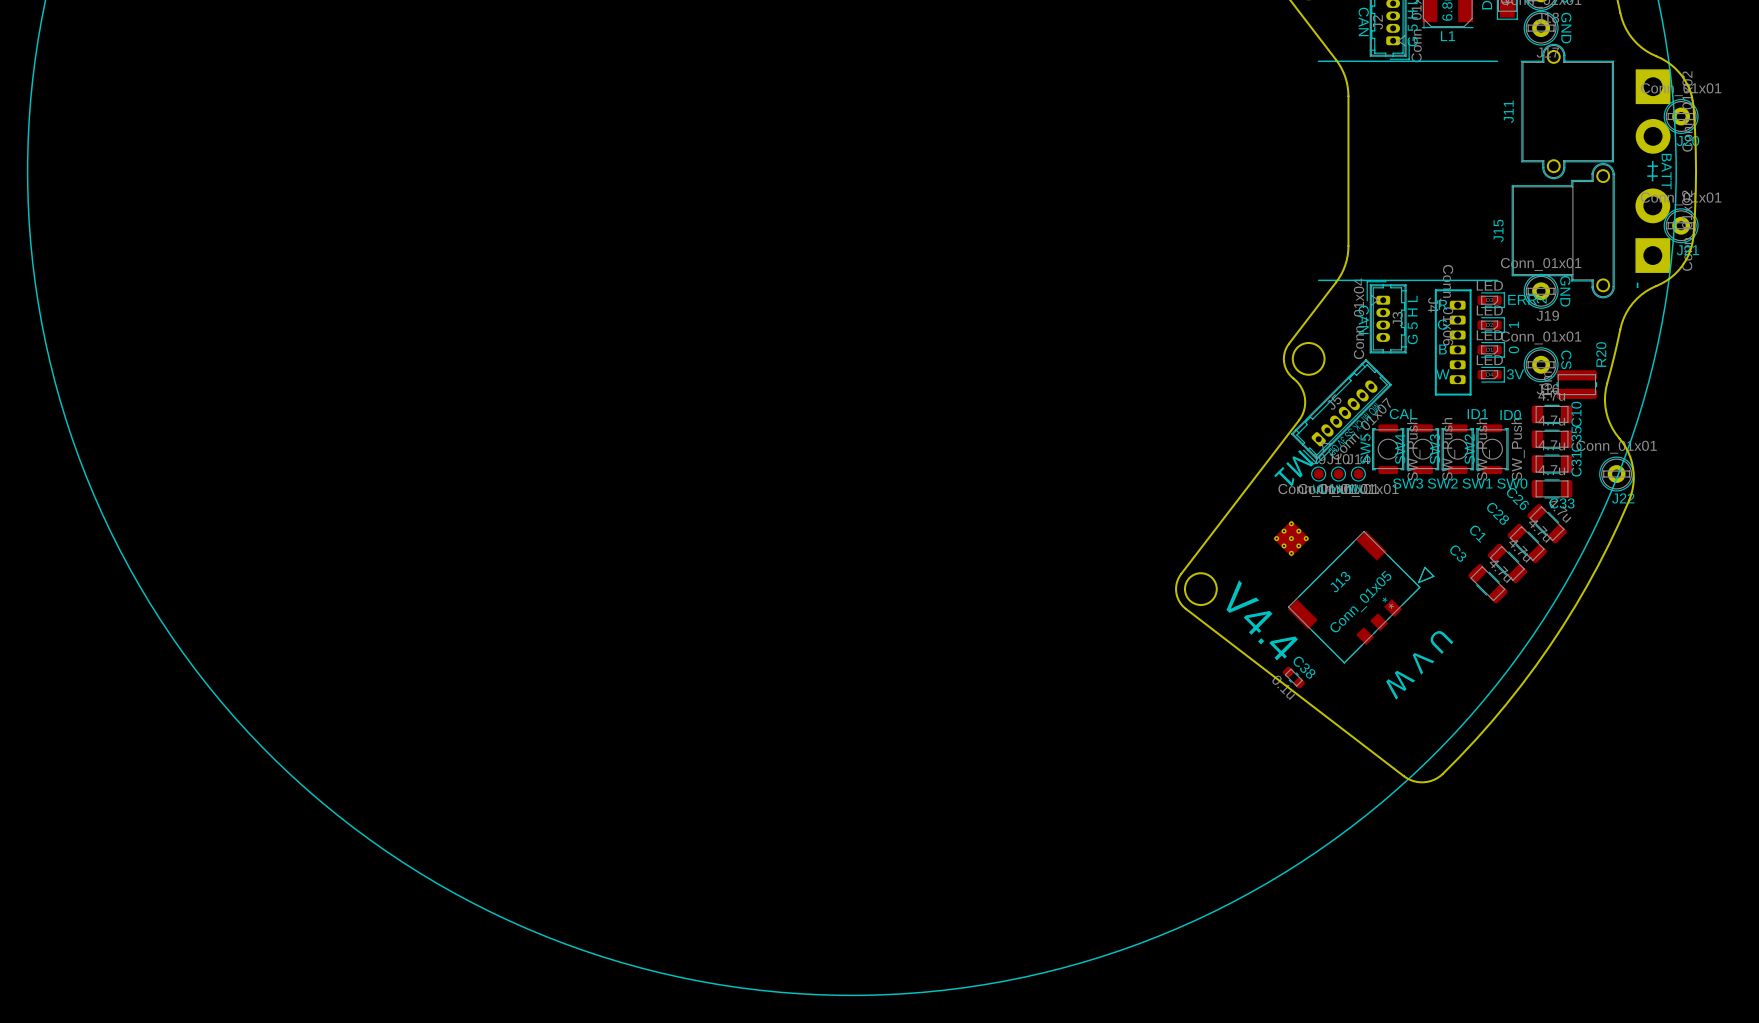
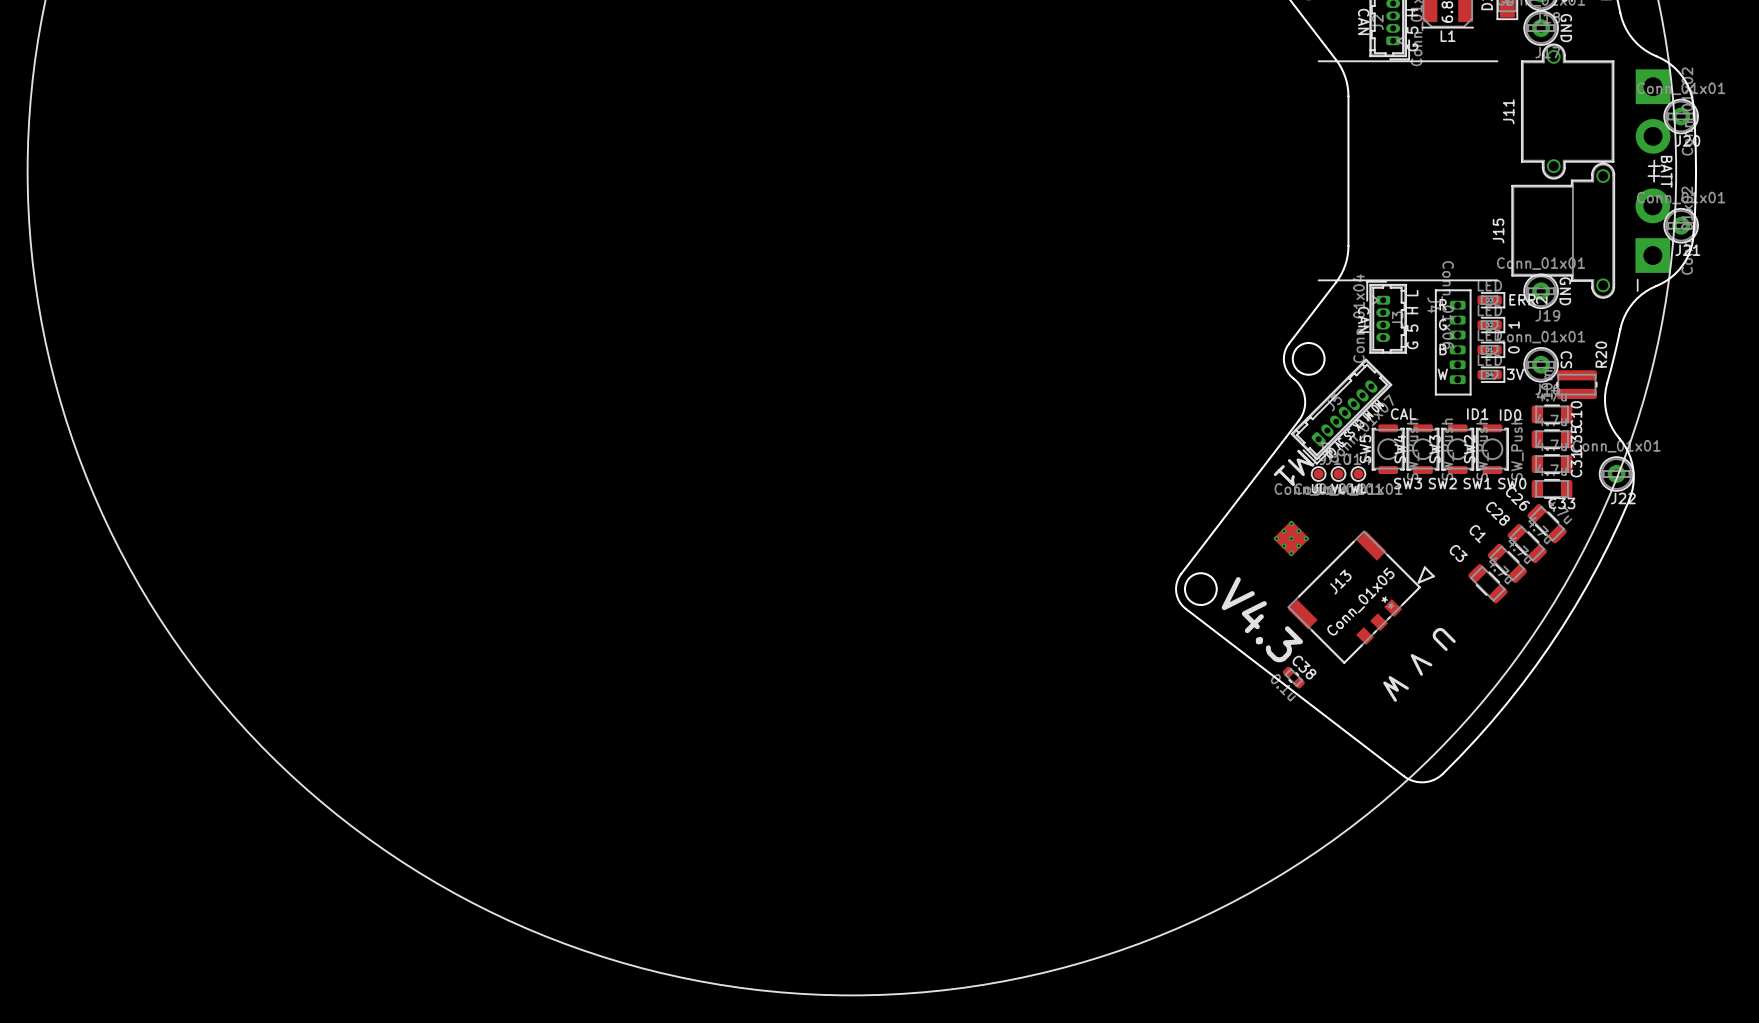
text: V4.4 (1262, 620) -> V4.3 (1262, 619)

